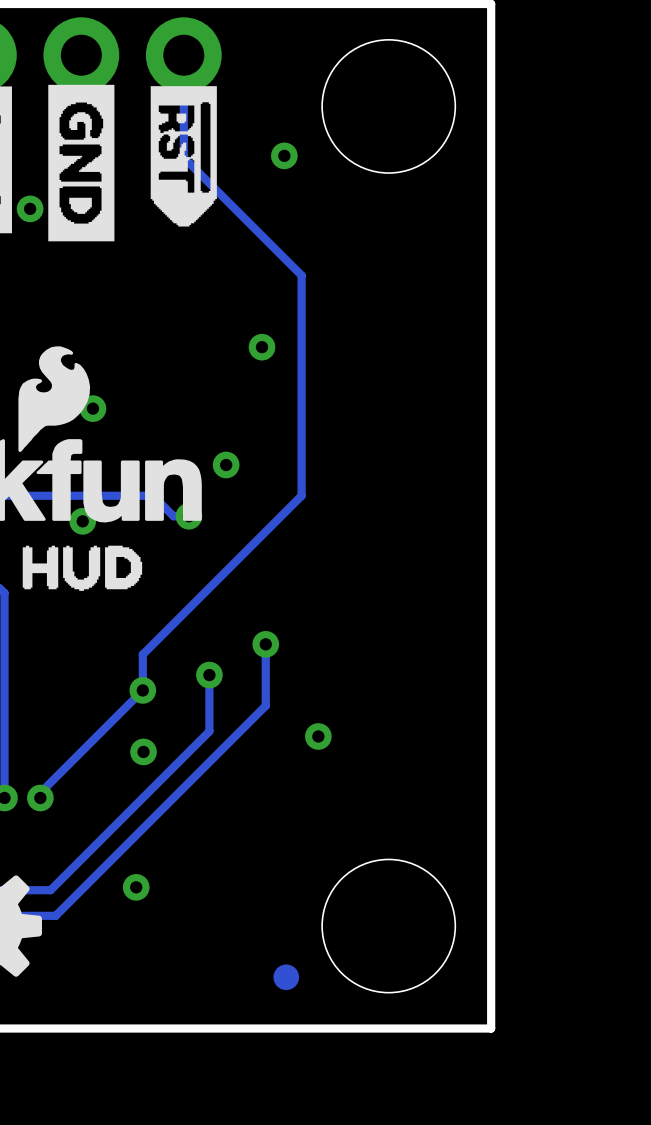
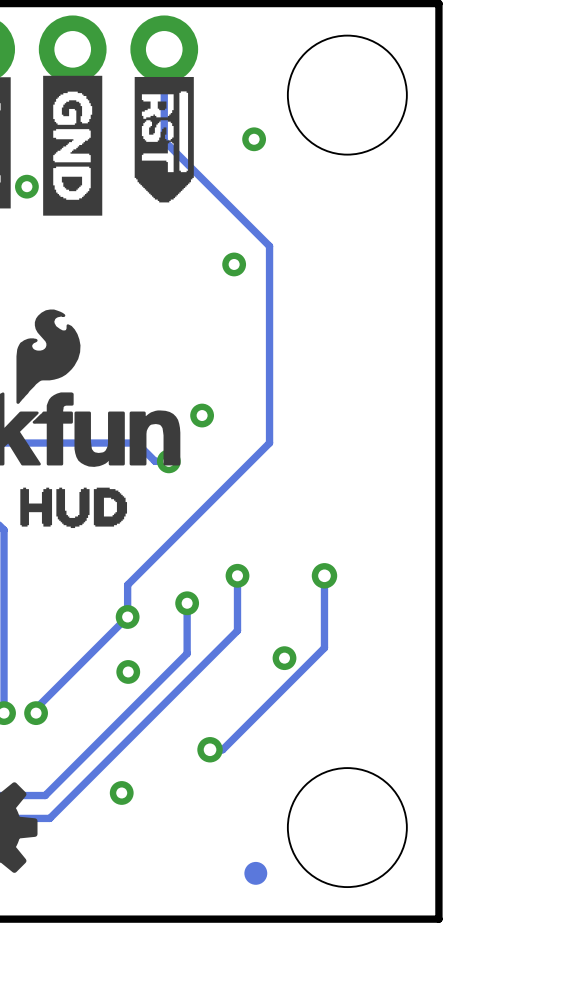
via position: (262, 347) -> (234, 264)
via: (92, 408) -> none
via: (82, 521) -> none
track: none -> (324, 575) (324, 647) (222, 749) (210, 749)
via: none -> (324, 575)
via: none -> (210, 749)

